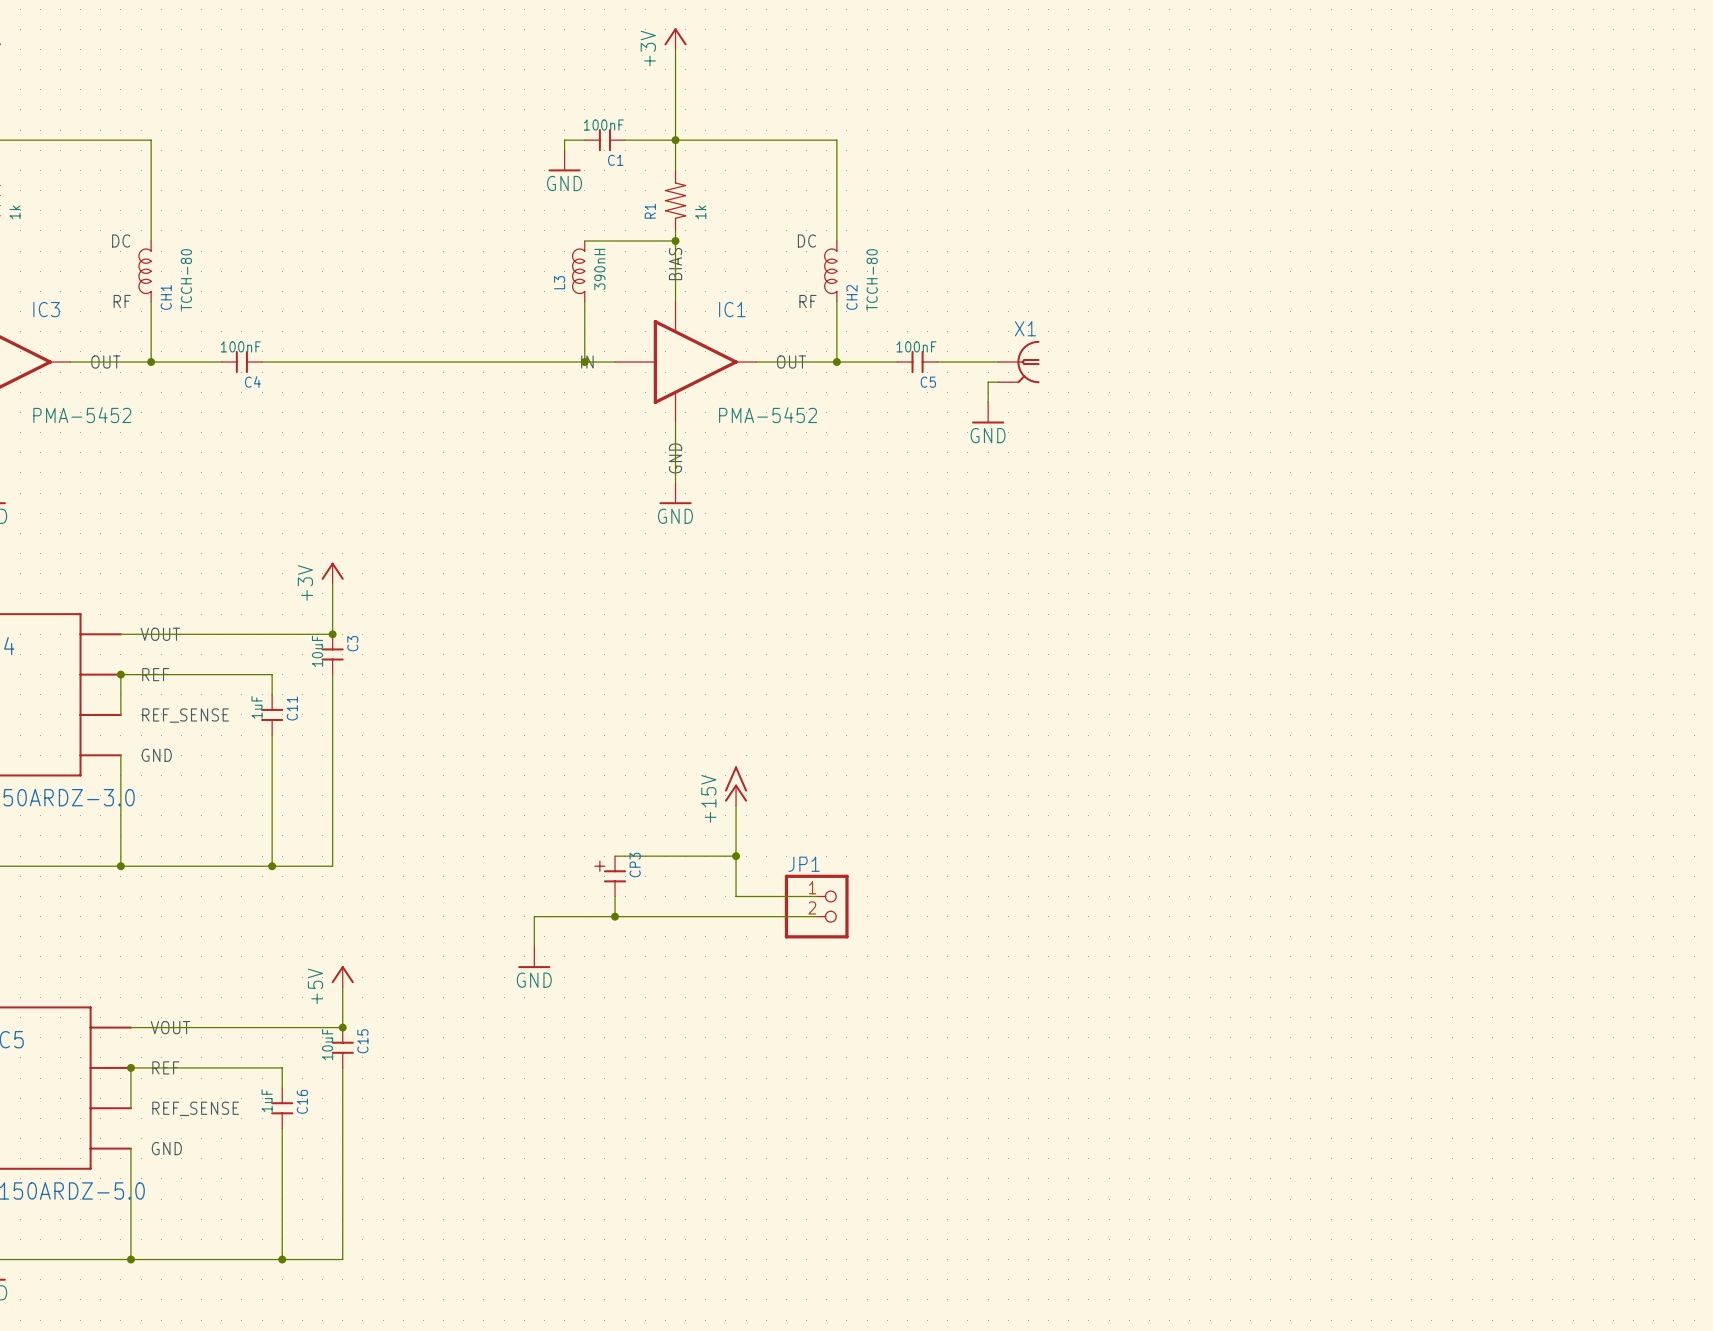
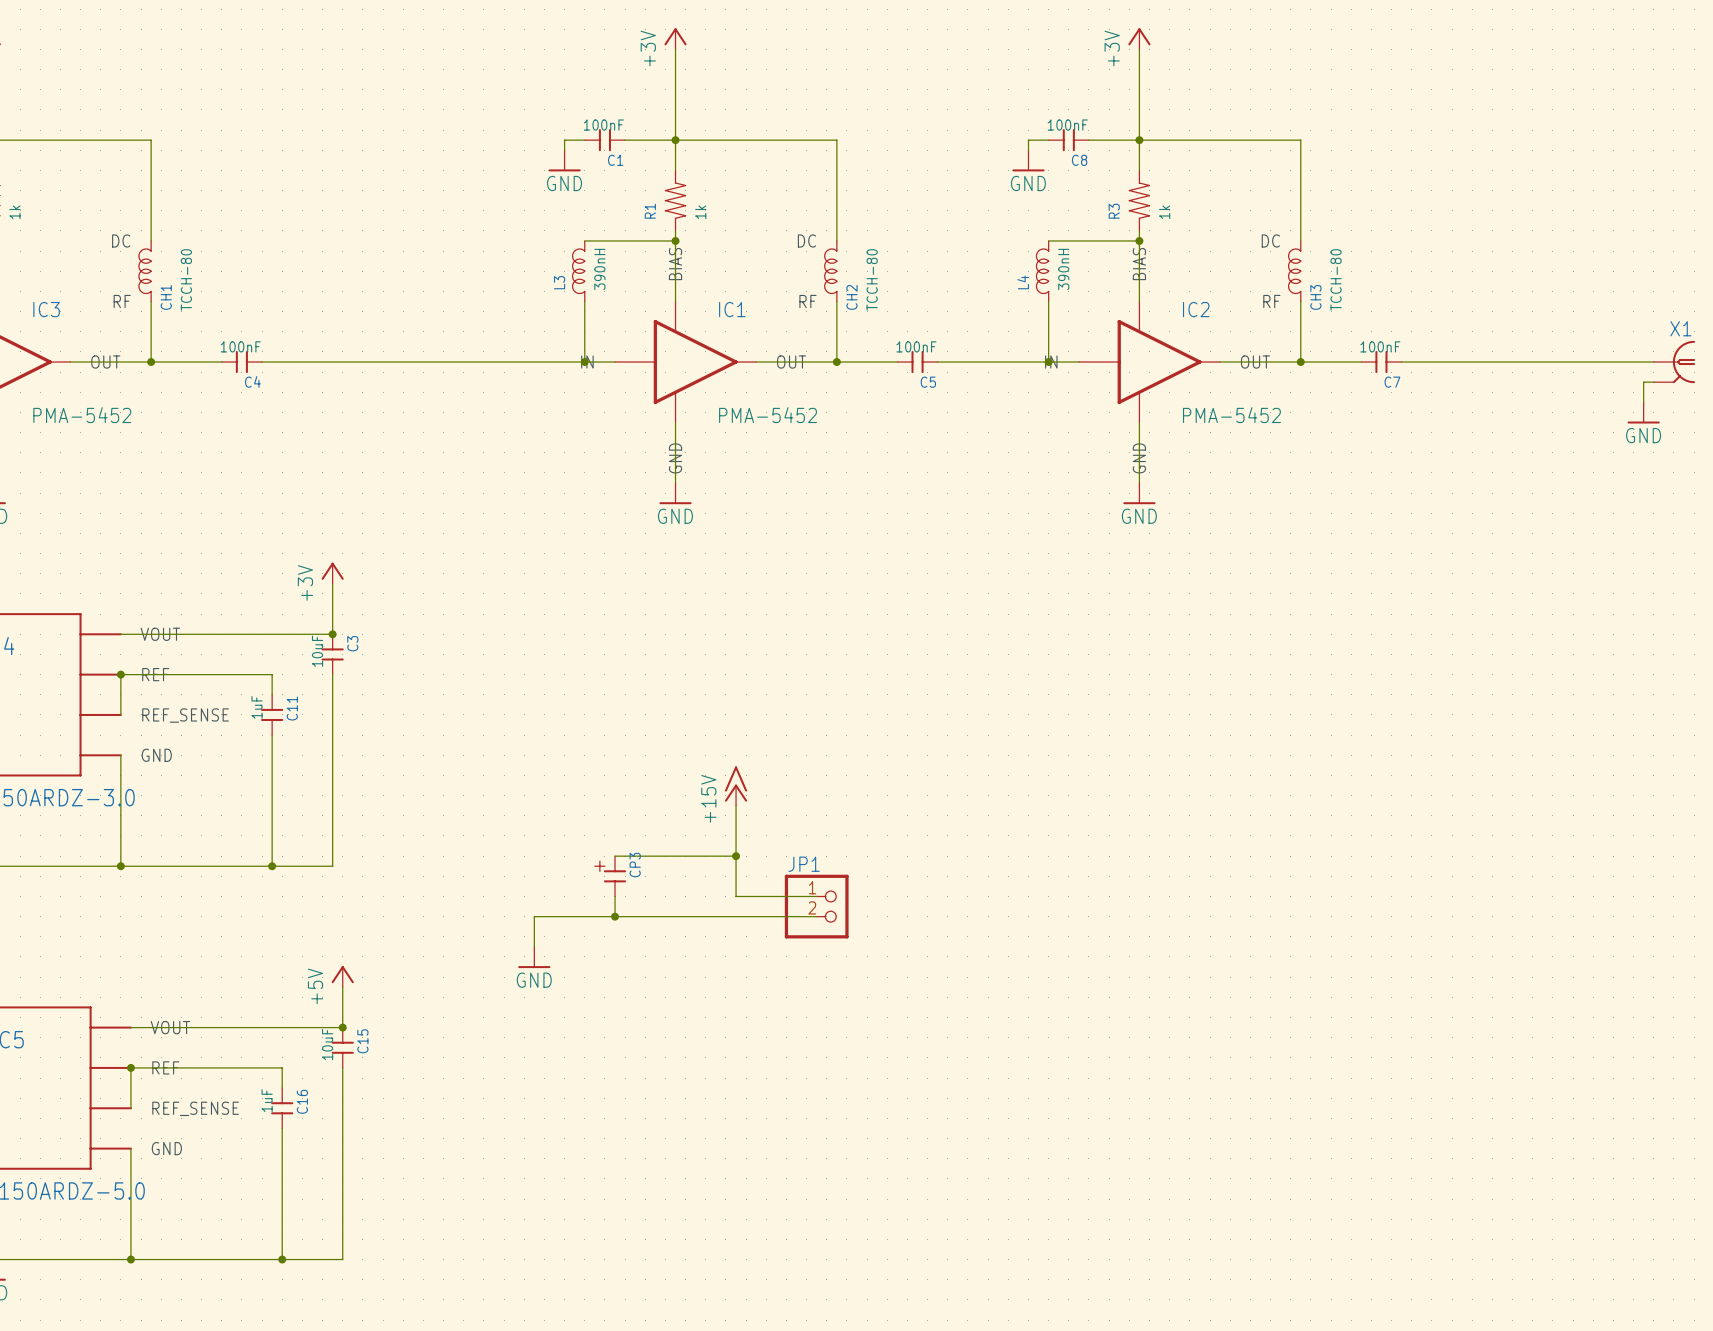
power symbol: none -> +3V (1139, 38)
wire: none -> (1139, 49) (1139, 170)
wire: none -> (1048, 140) (1028, 140) (1028, 150)
C8: none -> 100nF (1068, 140)
wire: none -> (1088, 140) (1300, 140) (1300, 240)
junction: none -> (1139, 140)
power symbol: none -> GND (1028, 160)
R3: none -> 1k (1139, 200)
wire: none -> (1139, 230) (1139, 301)
wire: none -> (1048, 240) (1139, 240)
junction: none -> (1139, 240)
L4: none -> 390nH (1042, 271)
CH3: none -> TCCH-80 (1294, 271)
wire: none -> (1048, 301) (1048, 362)
wire: none -> (1300, 301) (1300, 362)
wire: none -> (998, 362) (1078, 362)
X1 position: (1018, 362) -> (1674, 362)
junction: none -> (1048, 362)
IC2: none -> PMA-5452 (1149, 362)
wire: none -> (1220, 362) (1361, 362)
junction: none -> (1300, 362)
C7: none -> 100nF (1381, 362)
wire: none -> (1401, 362) (1653, 362)
wire: (998, 382) (988, 382) (988, 402) -> none
wire: none -> (1653, 382) (1643, 382) (1643, 402)
power symbol: GND (988, 412) -> none
power symbol: none -> GND (1643, 412)
wire: none -> (1139, 422) (1139, 483)
power symbol: none -> GND (1139, 493)

